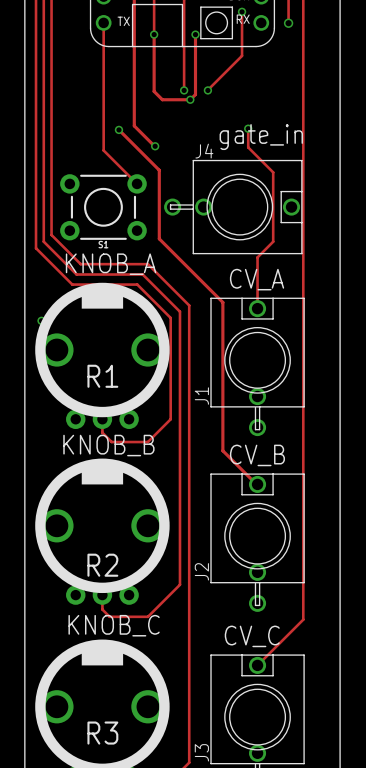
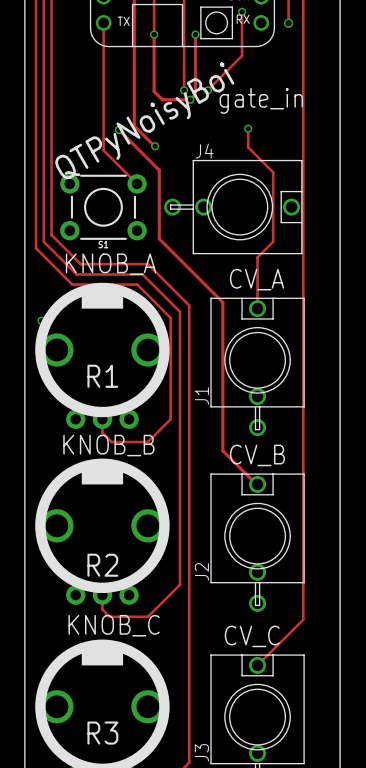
text: none -> QTPyNoisyBoi (144, 120)
text position: gate_in (261, 137) -> gate_in (261, 100)

